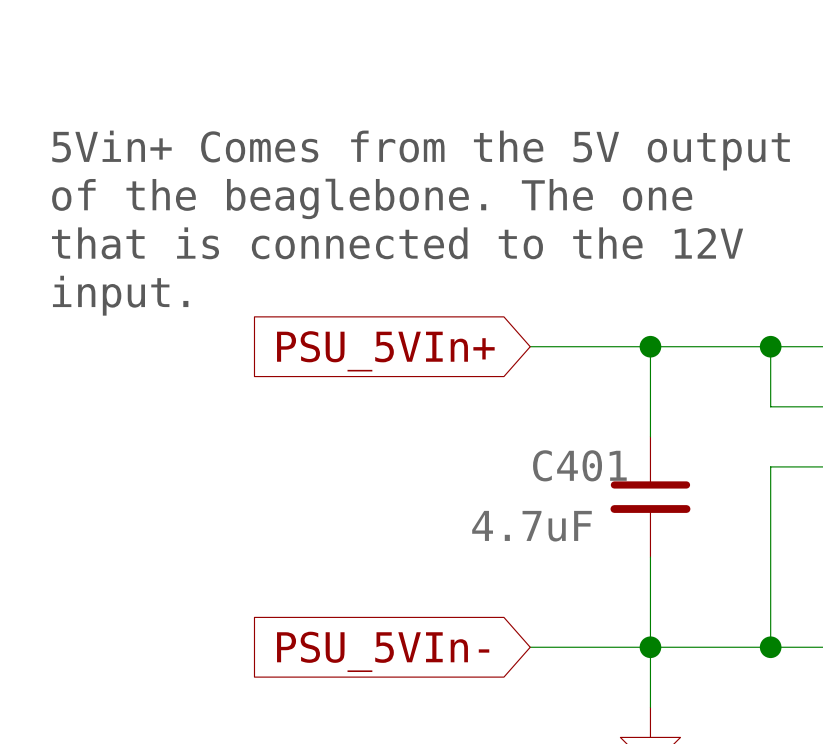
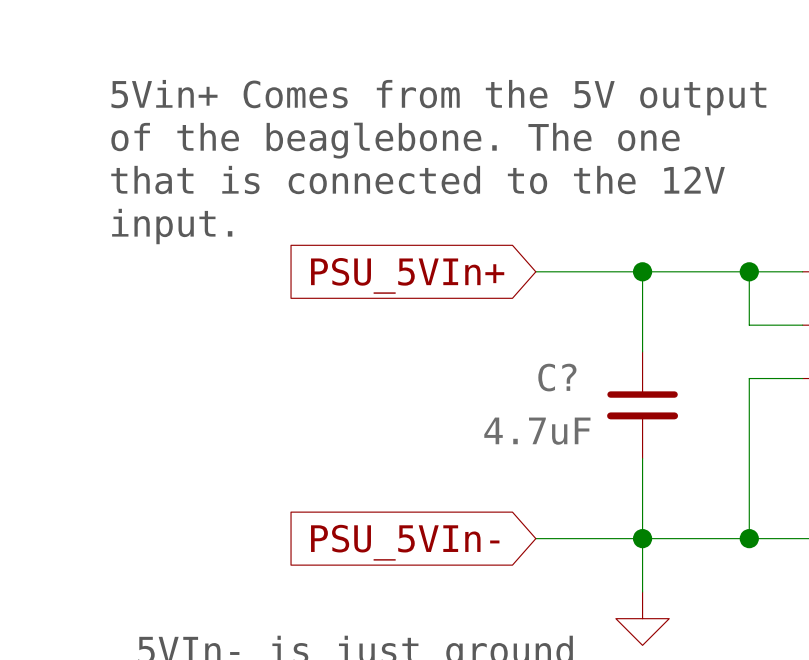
C401 name: C401 (579, 465) -> C? (557, 377)

